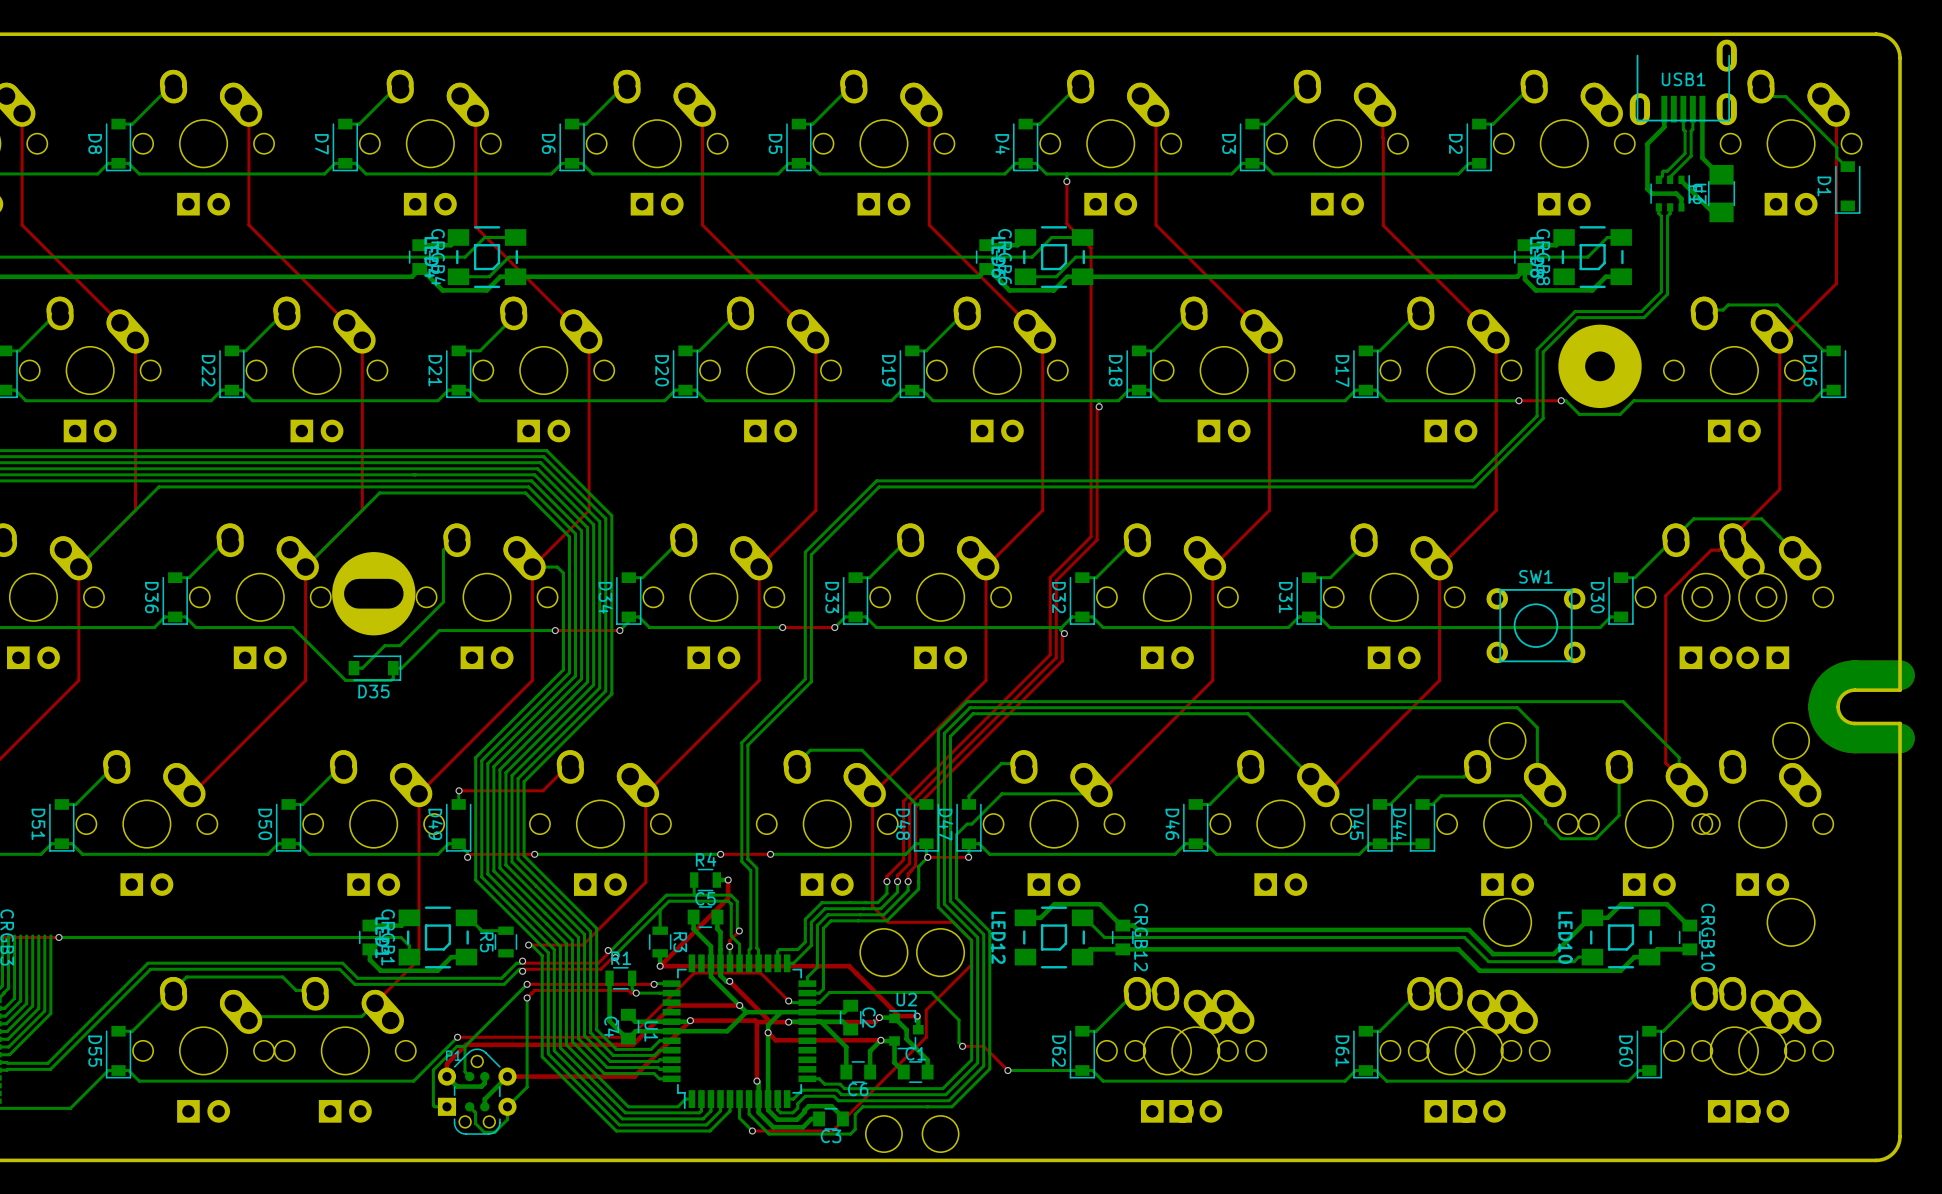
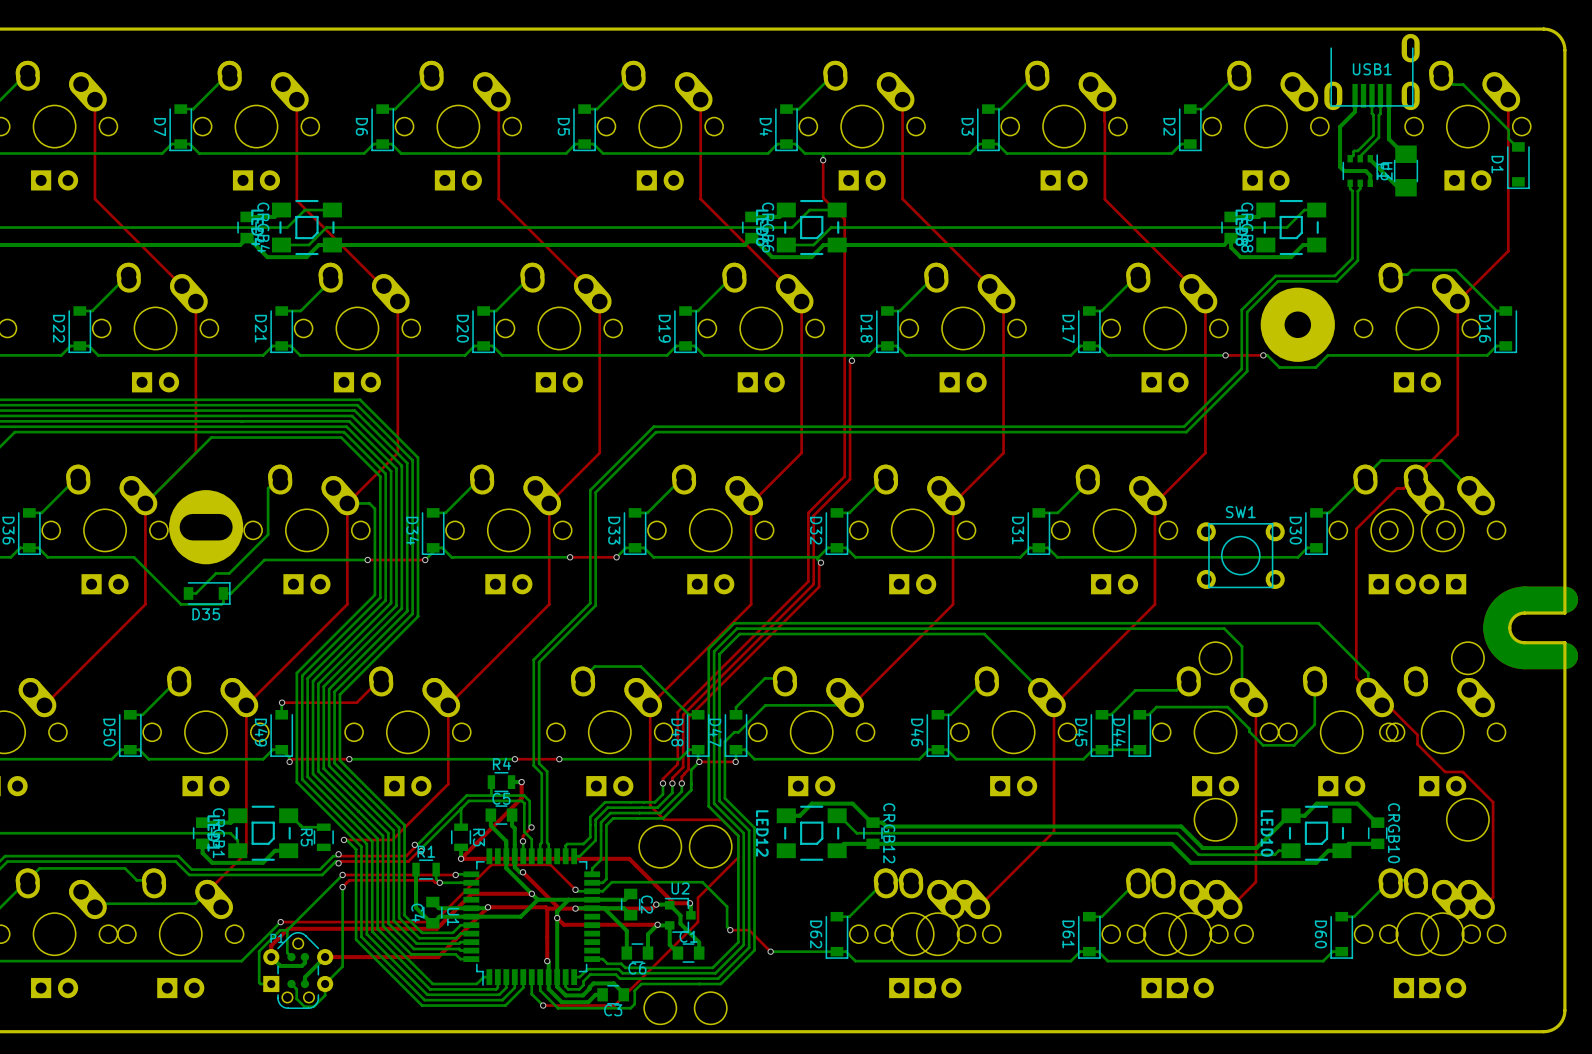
top track: none -> (1054, 705) (1054, 831) (978, 907)
top track: none -> (1255, 705) (1255, 882) (1230, 907)
top track: none -> (1382, 705) (1387, 705) (1417, 734) (1417, 744) (1445, 772) (1462, 772) (1493, 802) (1493, 897) (1483, 907)

